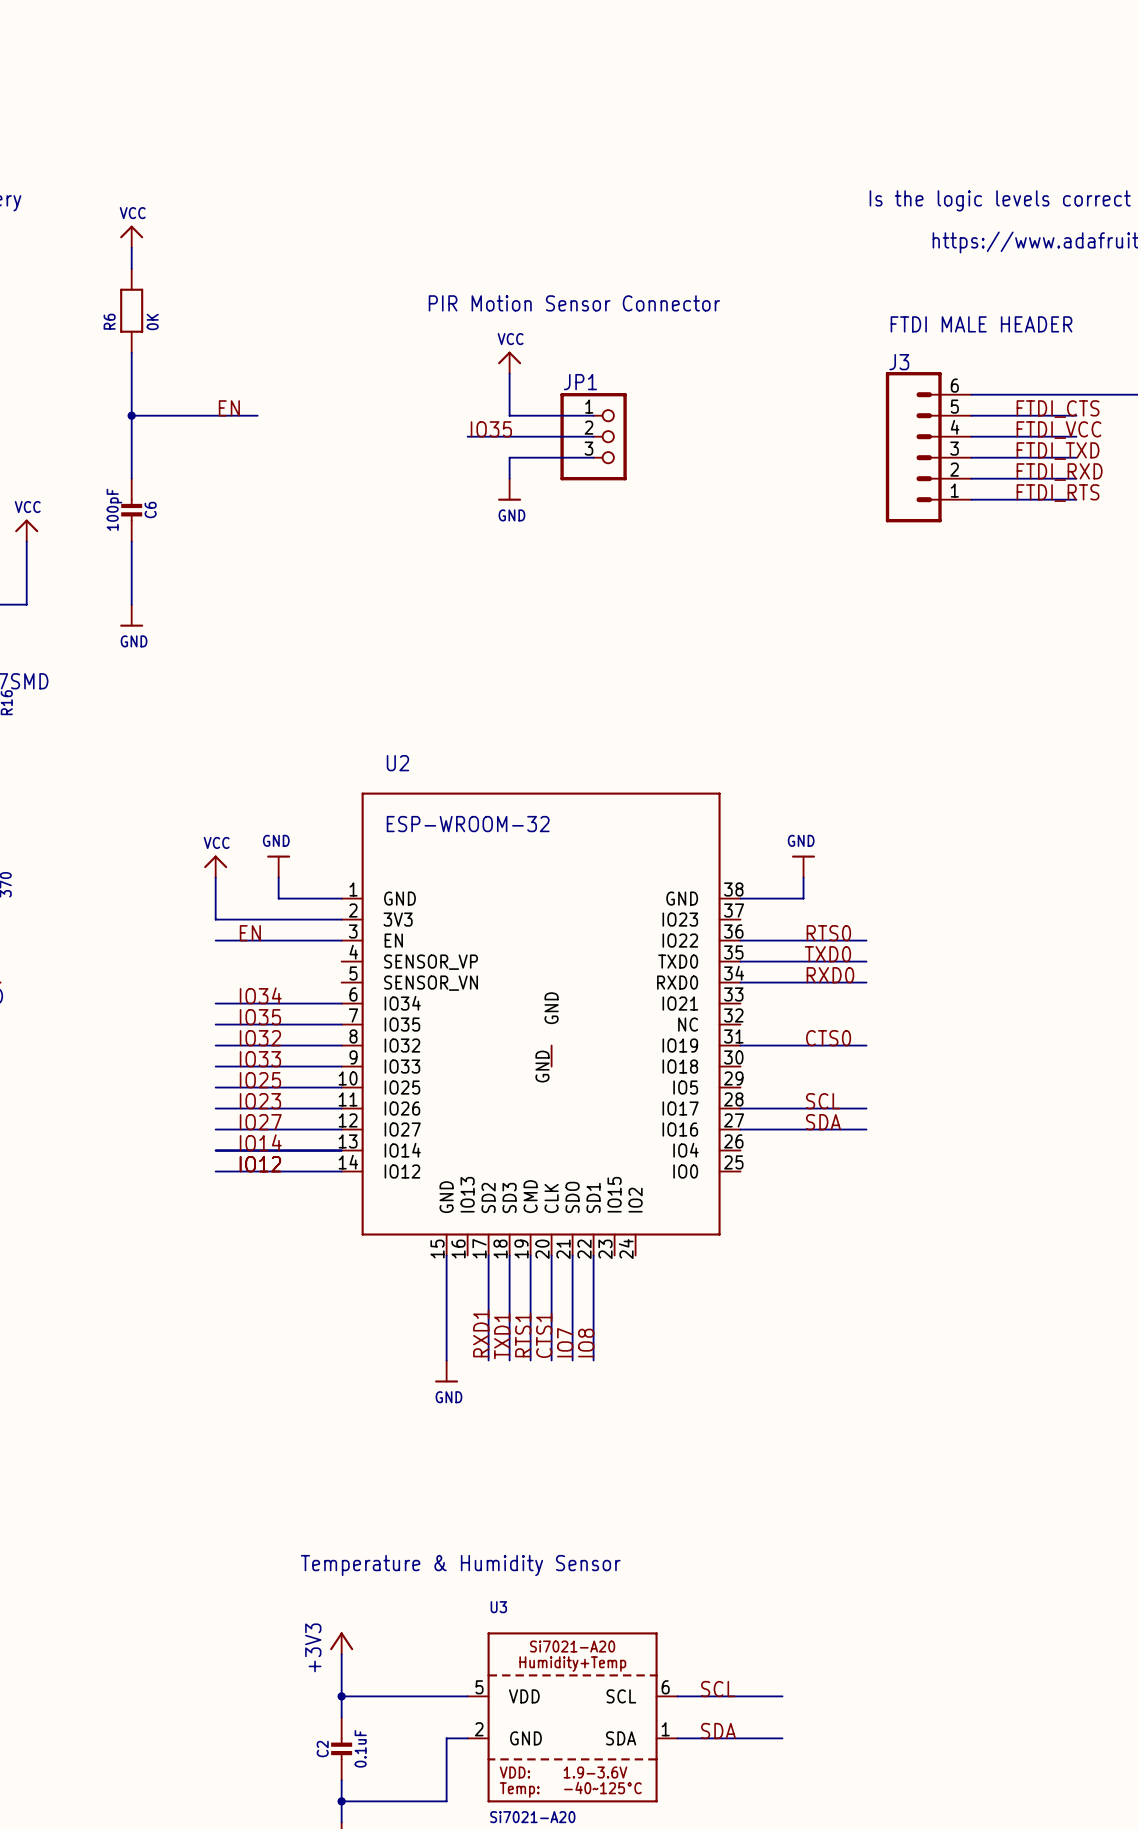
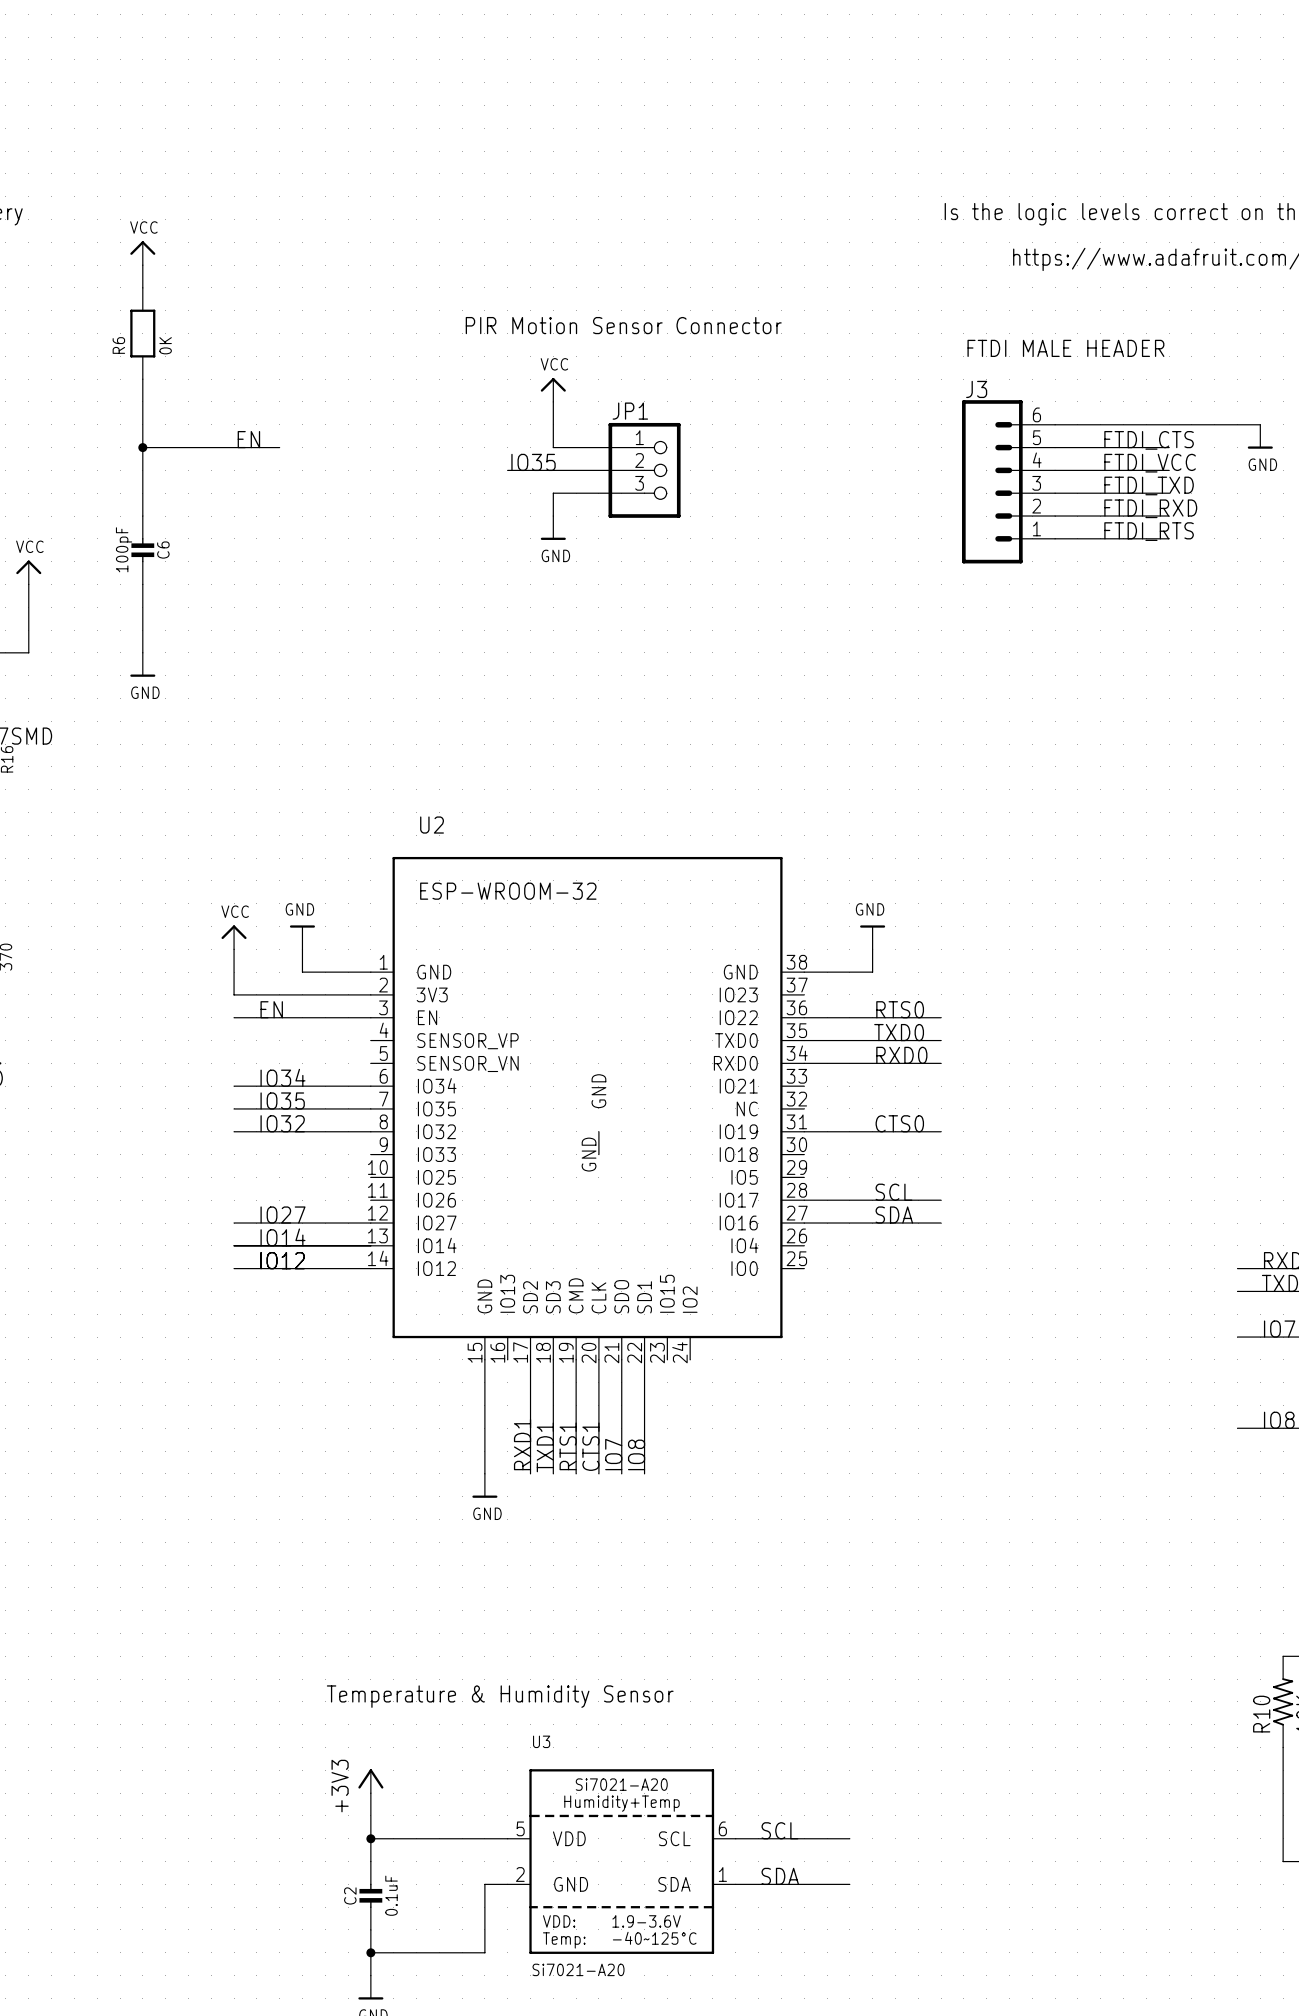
label: IO33 (260, 1059) -> none
wire: (215, 1066) (341, 1066) -> none
label: IO25 (260, 1080) -> none
wire: (215, 1087) (341, 1087) -> none
label: IO23 (260, 1101) -> none
wire: (215, 1108) (341, 1108) -> none

